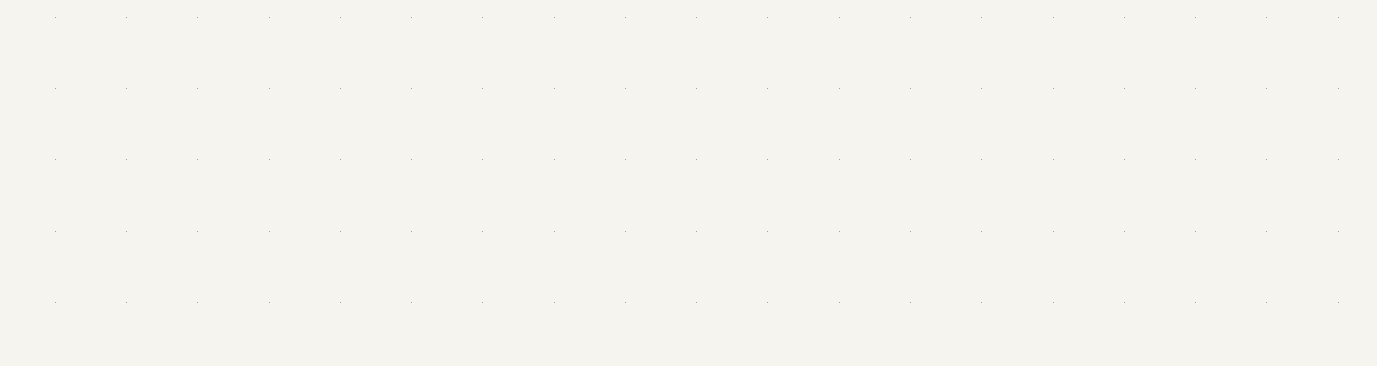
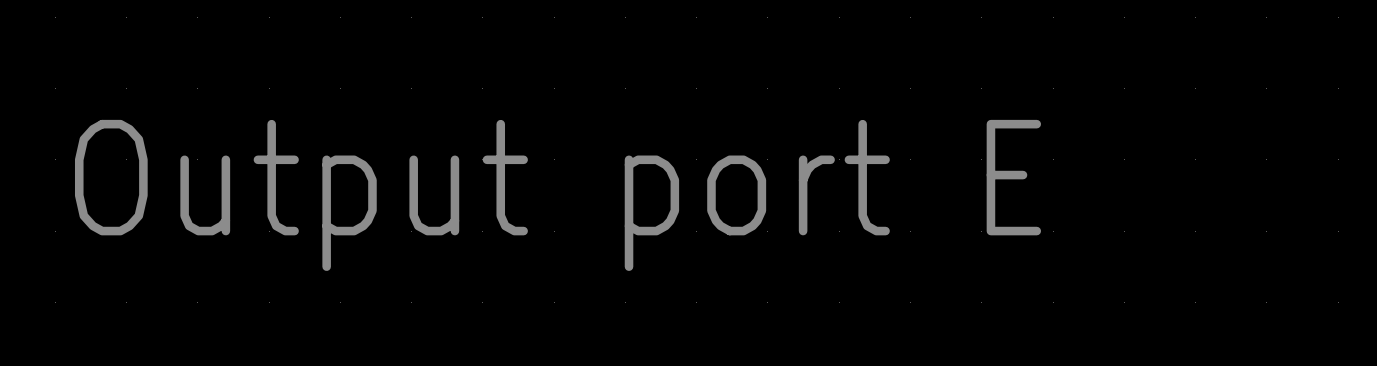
text: none -> Output port E (558, 195)

